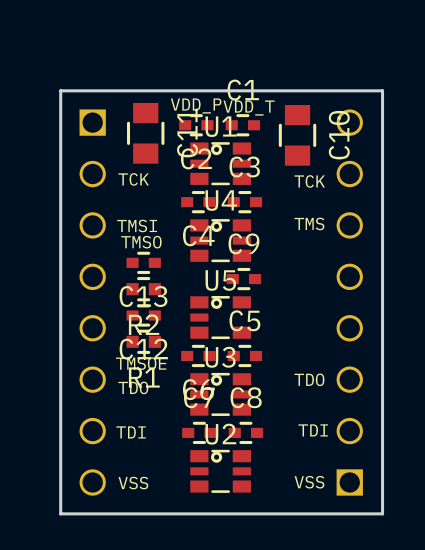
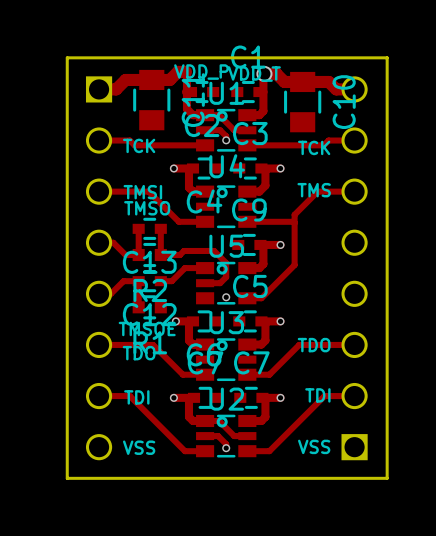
via: none -> (264, 73)
track: none -> (99, 89) (116, 89) (125, 79) (169, 79) (177, 71) (185, 71) (186, 92)
track: none -> (354, 89) (336, 89) (328, 81) (284, 81) (276, 73) (264, 73) (263, 111) (259, 115) (247, 115)
track: none -> (185, 92) (186, 109) (193, 115) (219, 115) (234, 130) (248, 130)
track: none -> (205, 130) (220, 130) (226, 136) (226, 140)
via: none -> (226, 140)
track: none -> (99, 140) (129, 140) (134, 145) (205, 145)
track: none -> (354, 140) (328, 140) (323, 145) (247, 145)
track: none -> (173, 168) (188, 168) (188, 187) (193, 191) (205, 191)
via: none -> (173, 168)
track: none -> (280, 168) (265, 168) (265, 185) (259, 191) (247, 191)
via: none -> (280, 168)
track: none -> (99, 191) (148, 191) (178, 221) (205, 221)
track: none -> (354, 191) (317, 191) (294, 214) (294, 265) (261, 298) (247, 298)
track: none -> (247, 221) (294, 222)
track: none -> (138, 229) (137, 255)
track: none -> (160, 229) (161, 255)
track: none -> (99, 242) (113, 242) (125, 255) (138, 255)
track: none -> (280, 244) (263, 244) (263, 264) (259, 268) (247, 268)
via: none -> (280, 244)
track: none -> (160, 255) (179, 255) (183, 250) (214, 250) (226, 263) (226, 277) (220, 283) (205, 283)
track: none -> (205, 268) (184, 268) (171, 281) (160, 281)
track: none -> (99, 293) (110, 293) (123, 281) (137, 281) (138, 306)
via: none -> (226, 297)
track: none -> (175, 321) (188, 321) (188, 340) (193, 344) (205, 344)
via: none -> (175, 321)
track: none -> (280, 321) (265, 321) (265, 340) (261, 344) (247, 344)
via: none -> (280, 321)
track: none -> (99, 344) (153, 344) (182, 374) (205, 374)
track: none -> (354, 344) (299, 344) (269, 374) (247, 374)
C8 name: C8 (246, 397) -> C7 (251, 362)
track: none -> (99, 396) (129, 396) (184, 451) (205, 451)
track: none -> (354, 396) (324, 396) (269, 451) (247, 451)
track: none -> (173, 397) (188, 397) (188, 416) (193, 421) (219, 421) (234, 436) (246, 436)
via: none -> (173, 397)
track: none -> (280, 397) (265, 397) (265, 416) (261, 421) (247, 421)
via: none -> (280, 397)
track: none -> (205, 436) (218, 436) (226, 444) (226, 448)
via: none -> (226, 448)

